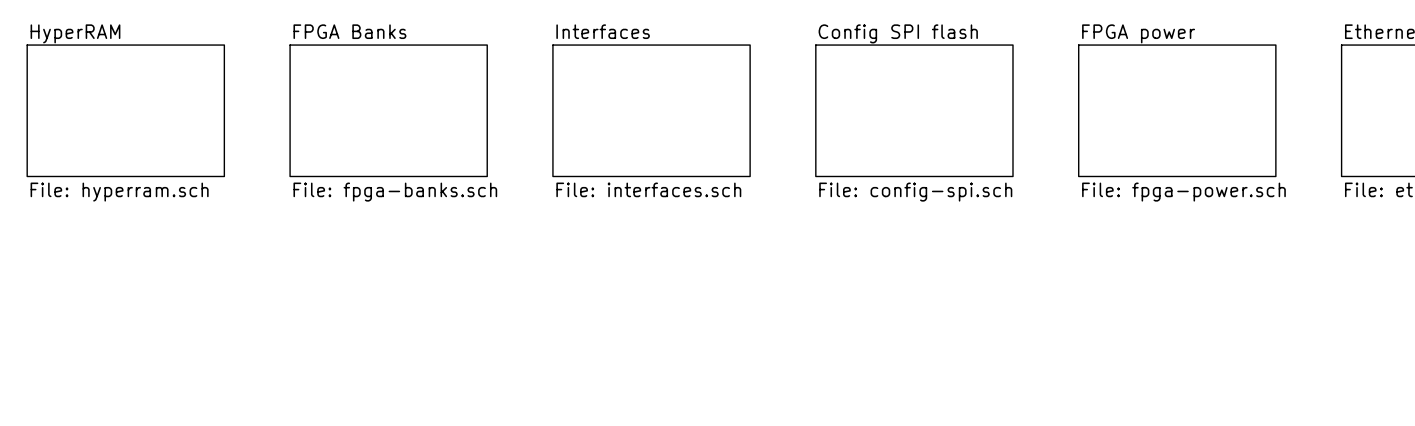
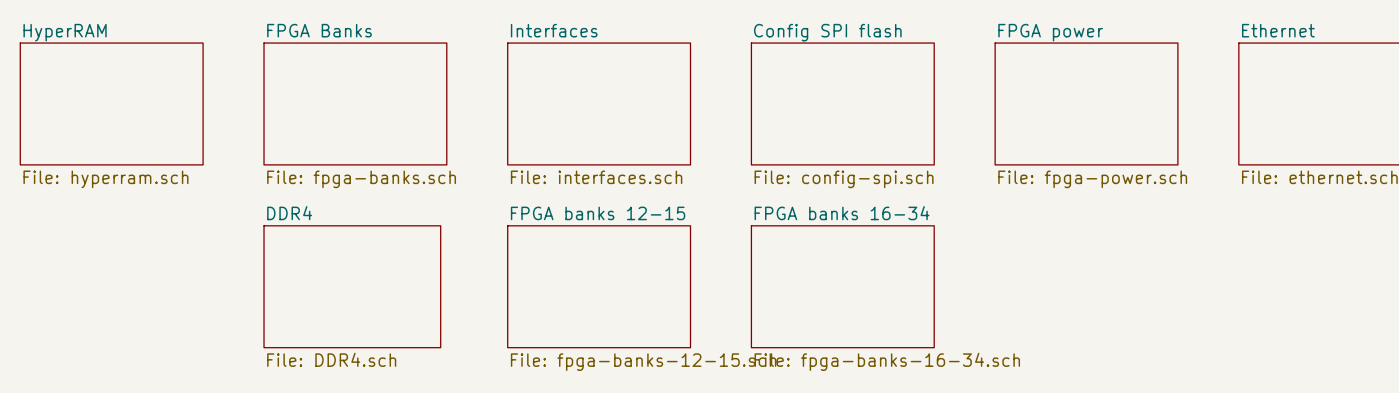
sheet DDR4: none -> File: DDR4.sch (352, 286)
sheet FPGA banks 12-15: none -> File: fpga-banks-12-15.sch (599, 286)
sheet FPGA banks 16-34: none -> File: fpga-banks-16-34.sch (842, 286)

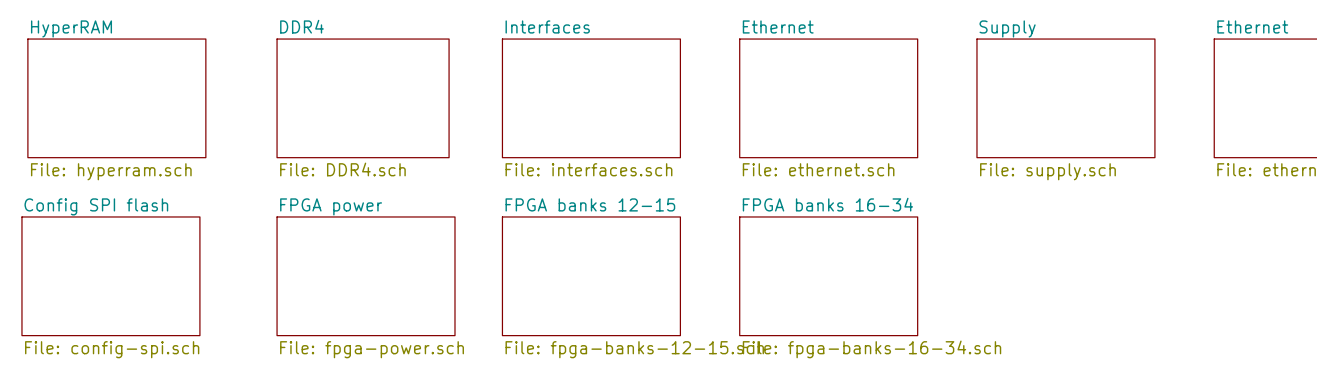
sheet Config SPI flash name: Config SPI flash (827, 32) -> Ethernet (778, 26)
sheet FPGA power name: FPGA power (1050, 32) -> Supply (1007, 28)
sheet FPGA Banks: File: fpga-banks.sch (355, 103) -> none
sheet Config SPI flash value: File: config-spi.sch (844, 179) -> File: ethernet.sch (818, 169)
sheet FPGA power value: File: fpga-power.sch (1092, 179) -> File: supply.sch (1047, 171)
sheet Config SPI flash: none -> File: config-spi.sch (110, 276)
sheet DDR4 position: (352, 286) -> (363, 98)
sheet FPGA power: none -> File: fpga-power.sch (366, 276)

